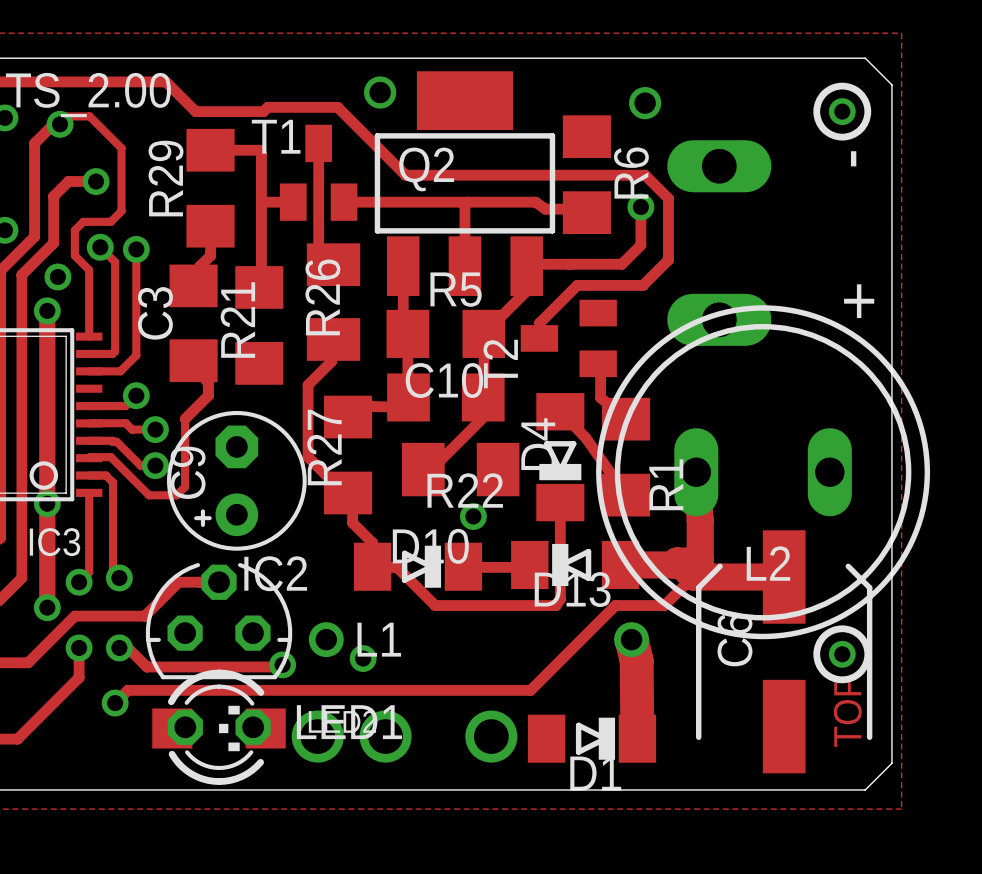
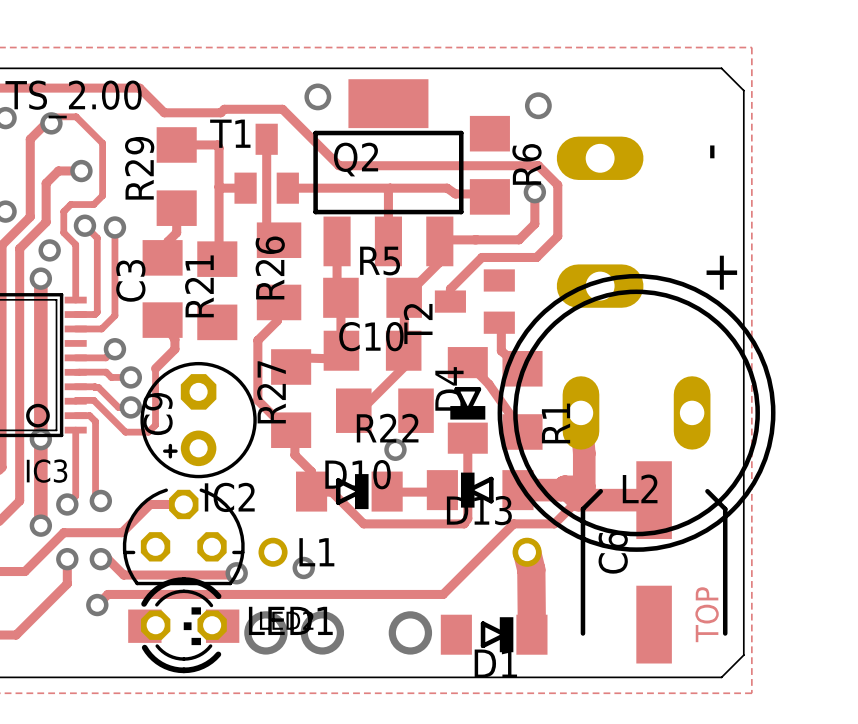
drawing: [813, 82, 872, 141] -> none
via: (842, 111) -> none
drawing: [813, 625, 872, 684] -> none
via: (842, 654) -> none

